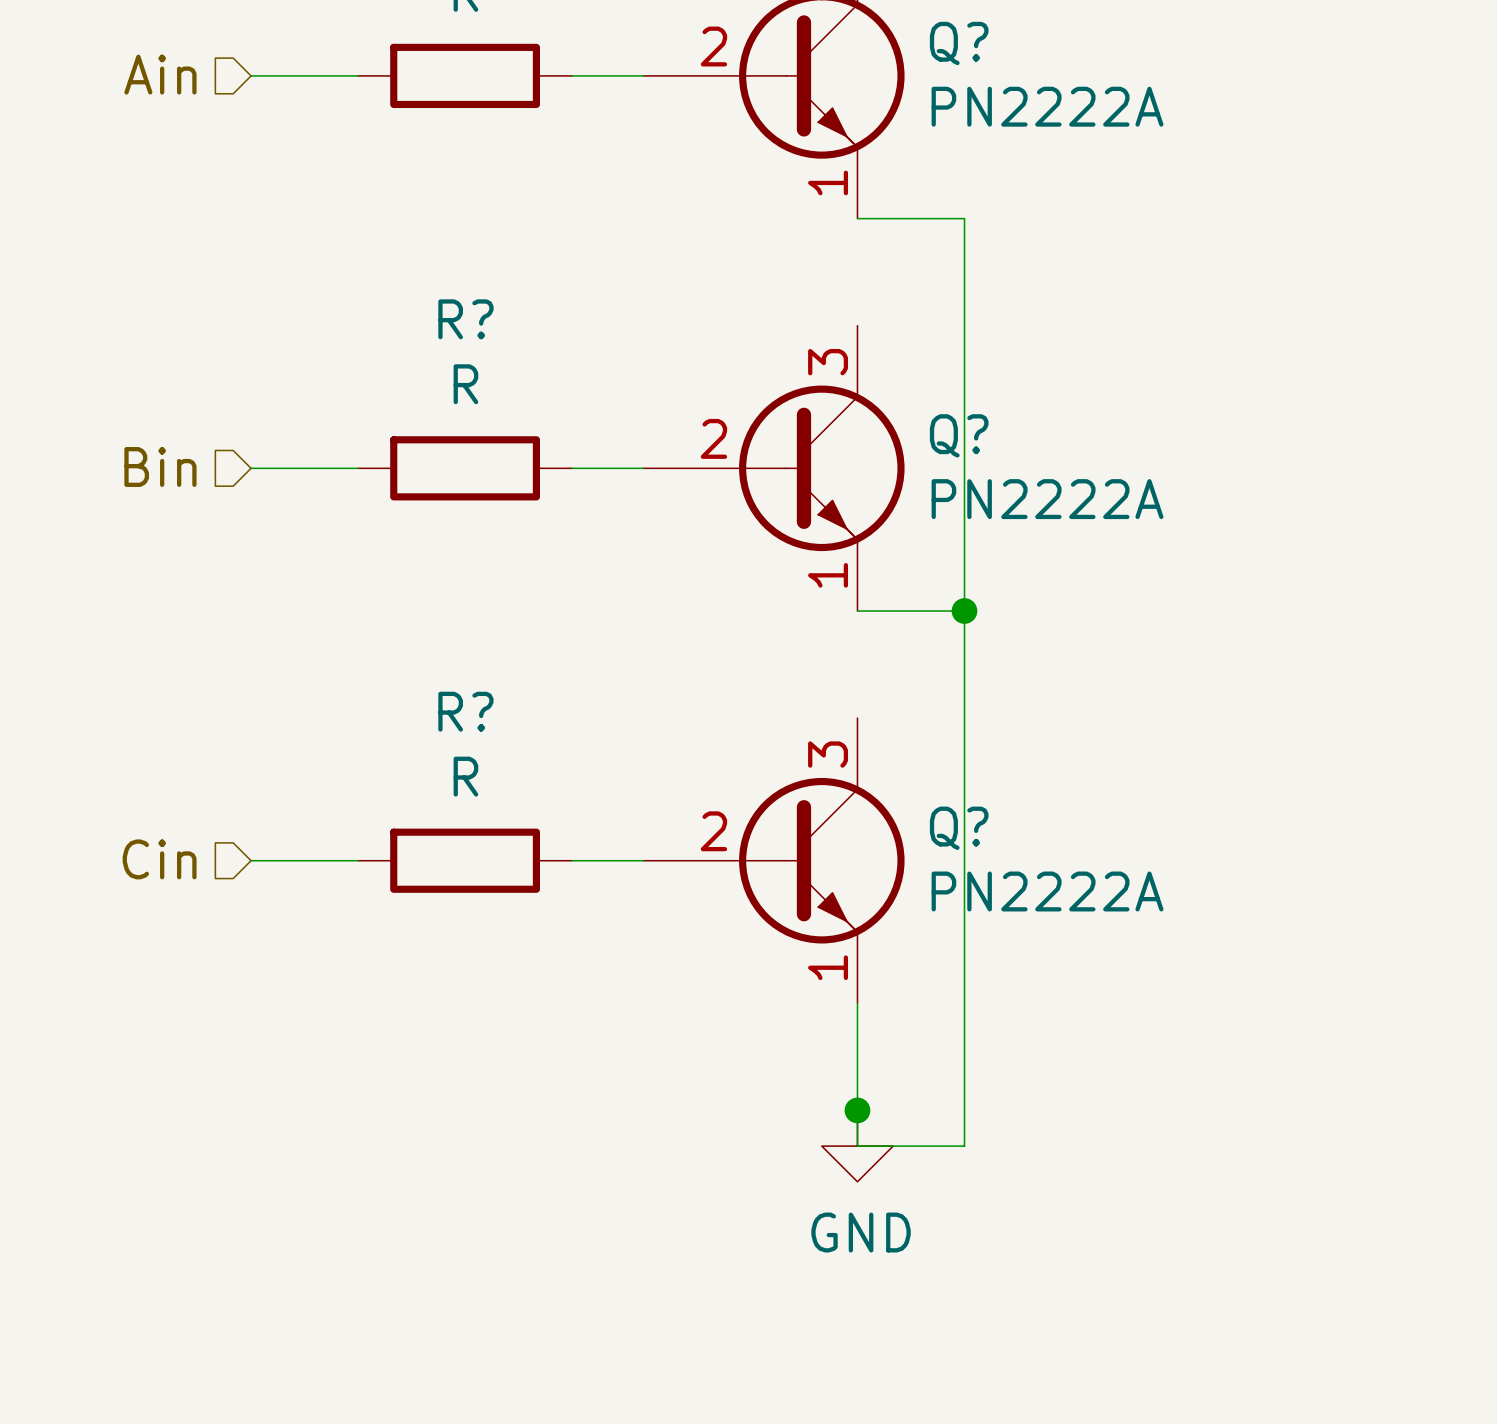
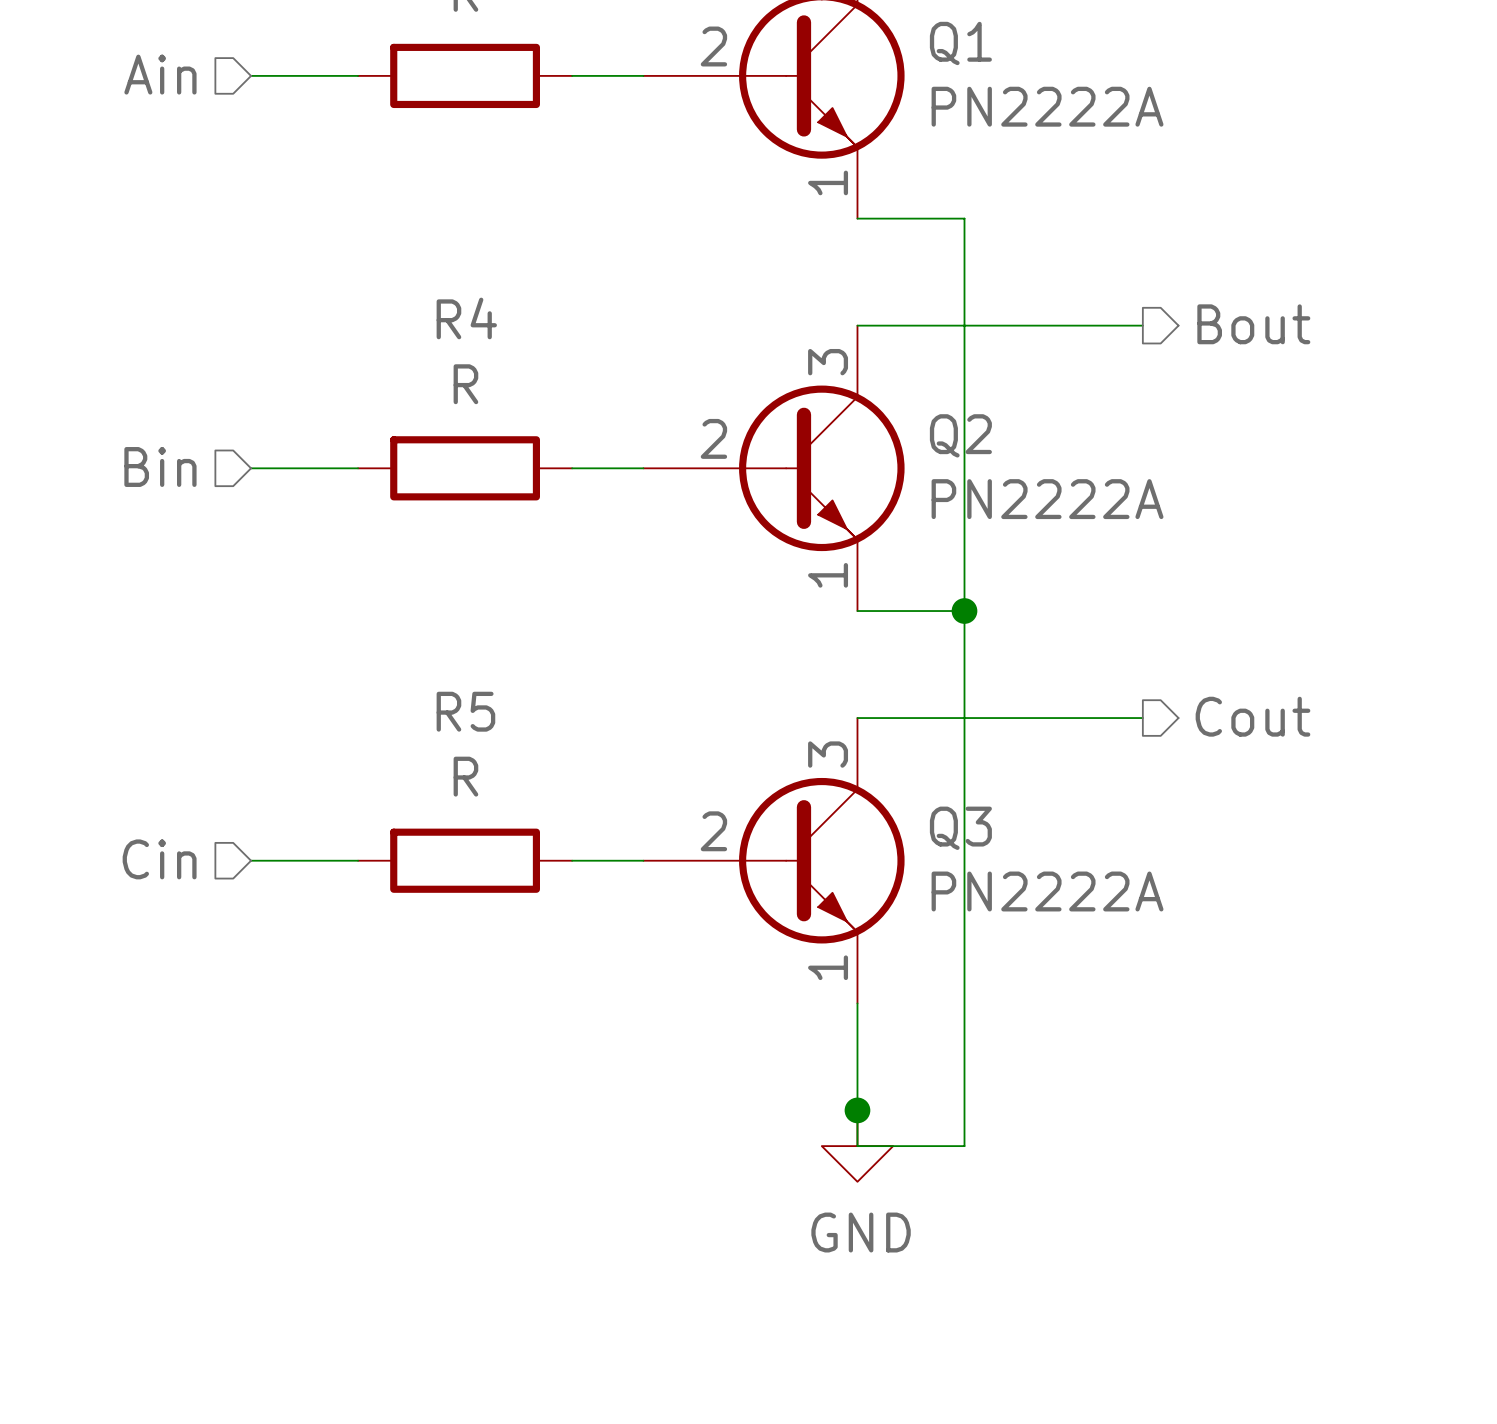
Q? name: Q? (959, 43) -> Q1 (960, 43)
R? name: R? (465, 319) -> R4 (466, 318)
hierarchical label: none -> Bout (1253, 324)
wire: none -> (857, 325) (1142, 325)
Q? name: Q? (959, 435) -> Q2 (960, 435)
R? name: R? (465, 711) -> R5 (465, 711)
hierarchical label: none -> Cout (1252, 716)
wire: none -> (857, 718) (1142, 718)
Q? name: Q? (959, 828) -> Q3 (960, 828)

